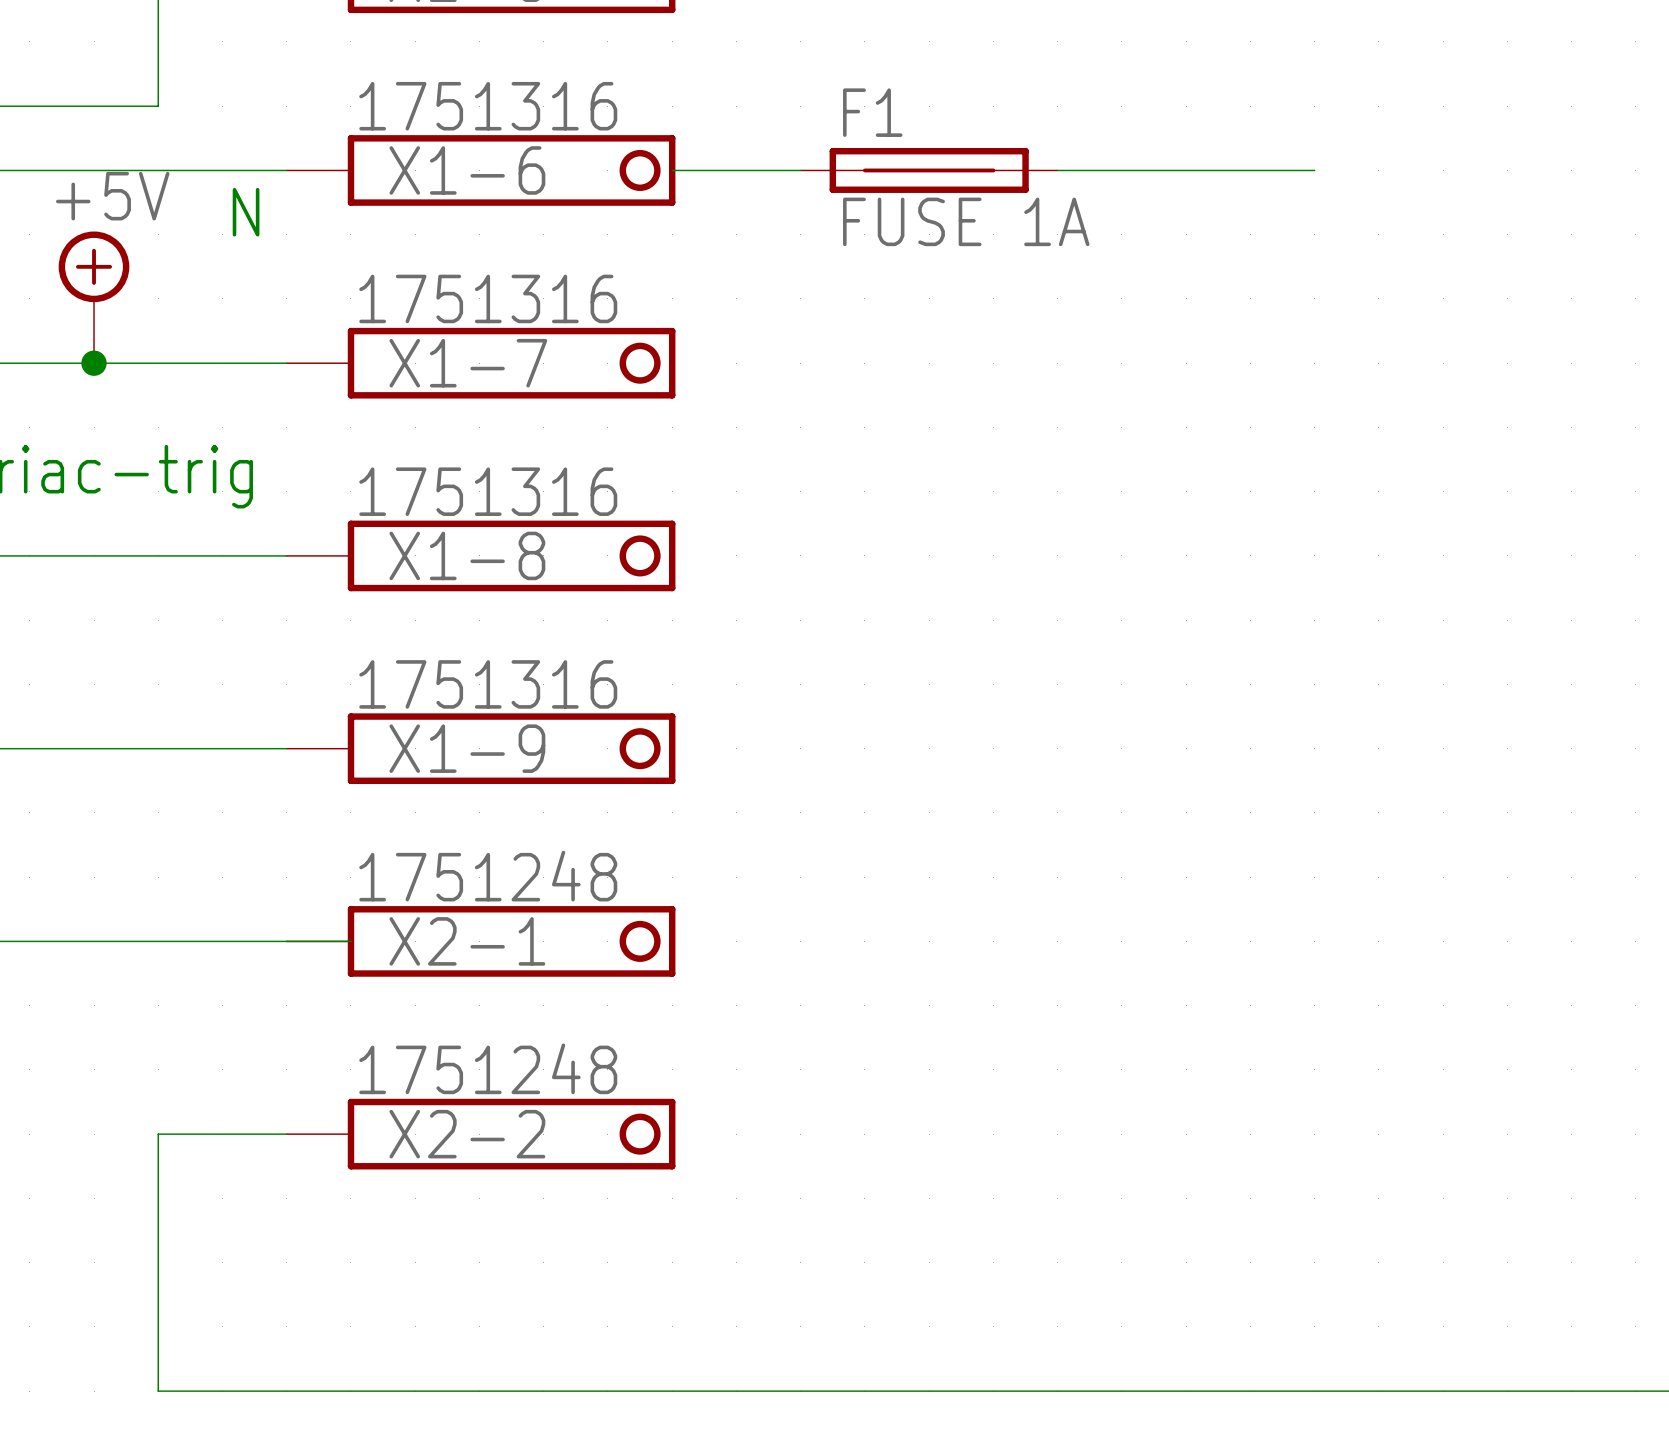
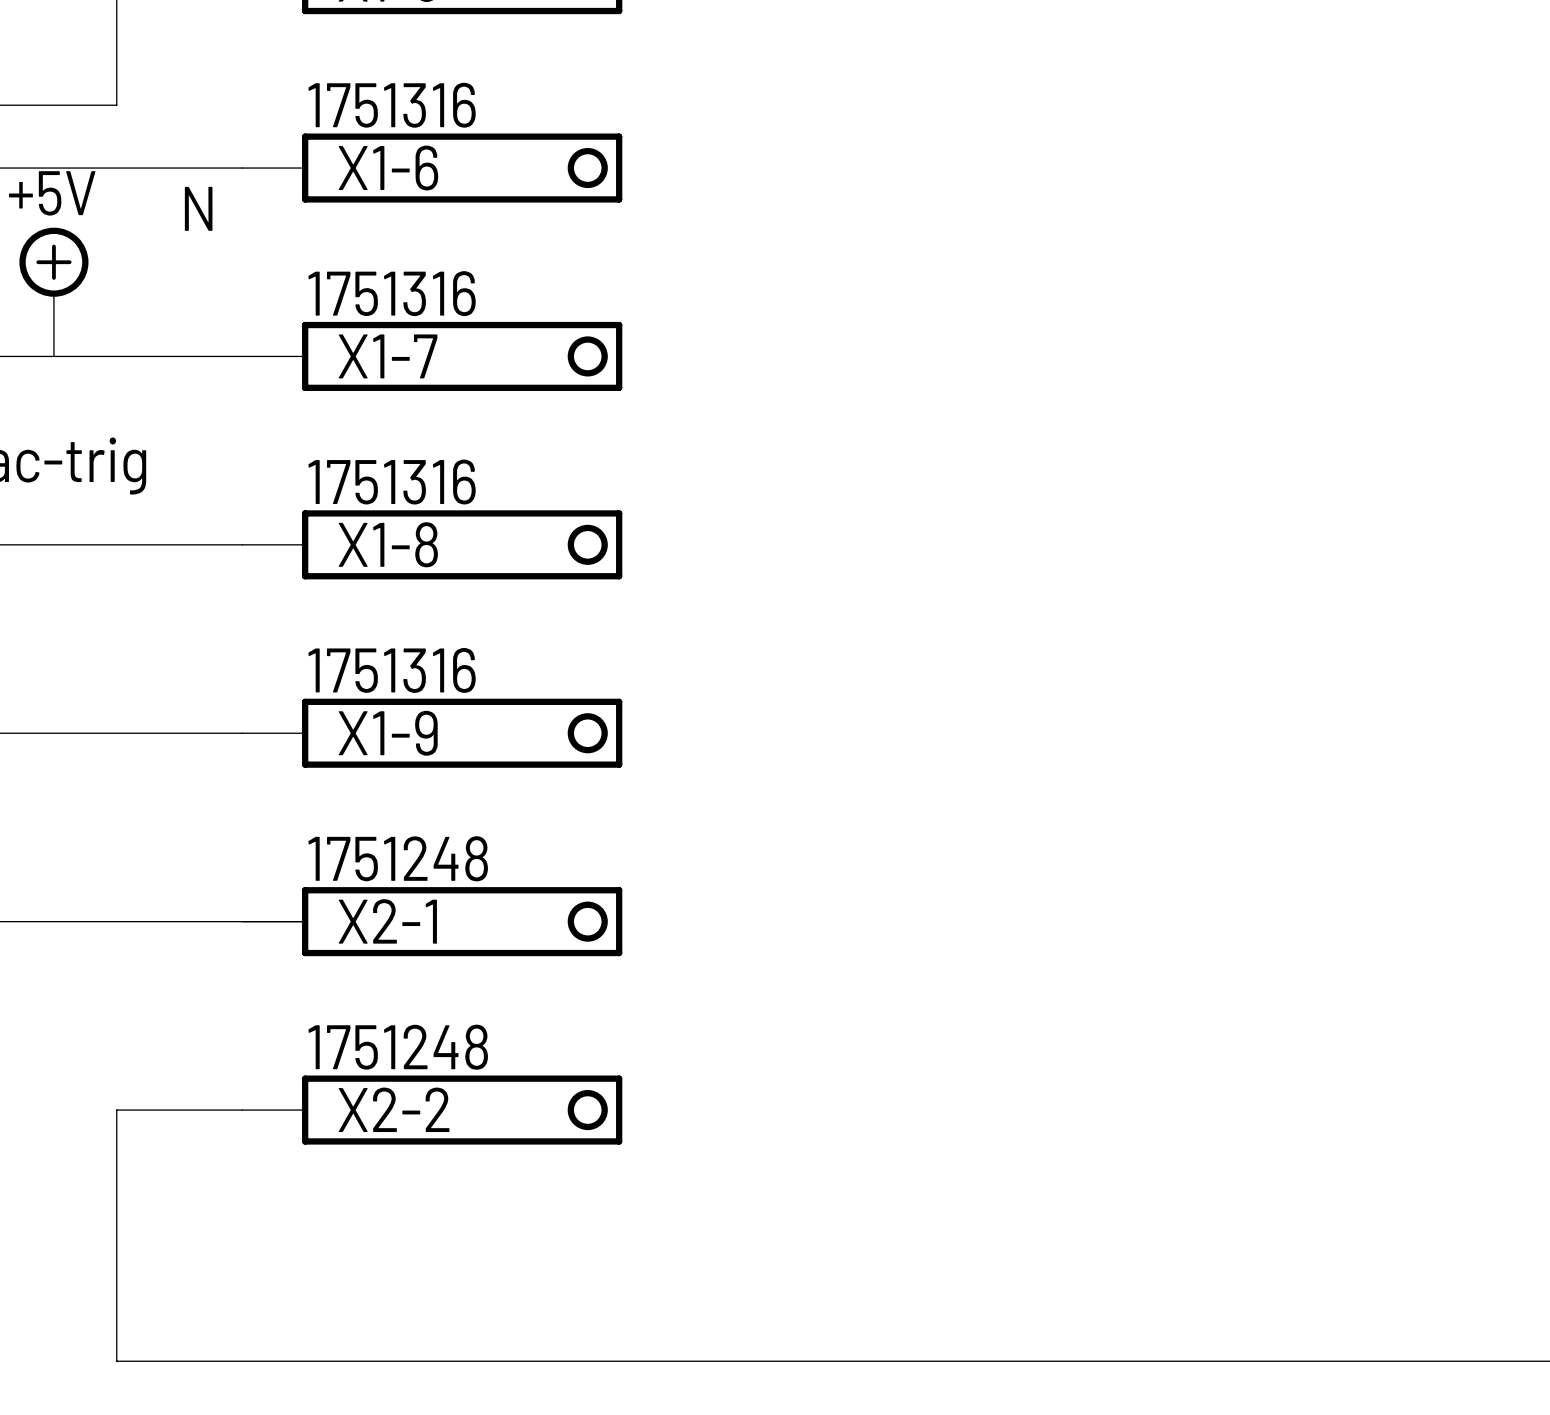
wire: (672, 170) (800, 170) -> none
F1: FUSE 1A (929, 170) -> none
wire: (1057, 170) (1314, 170) -> none
junction: (94, 363) -> none

